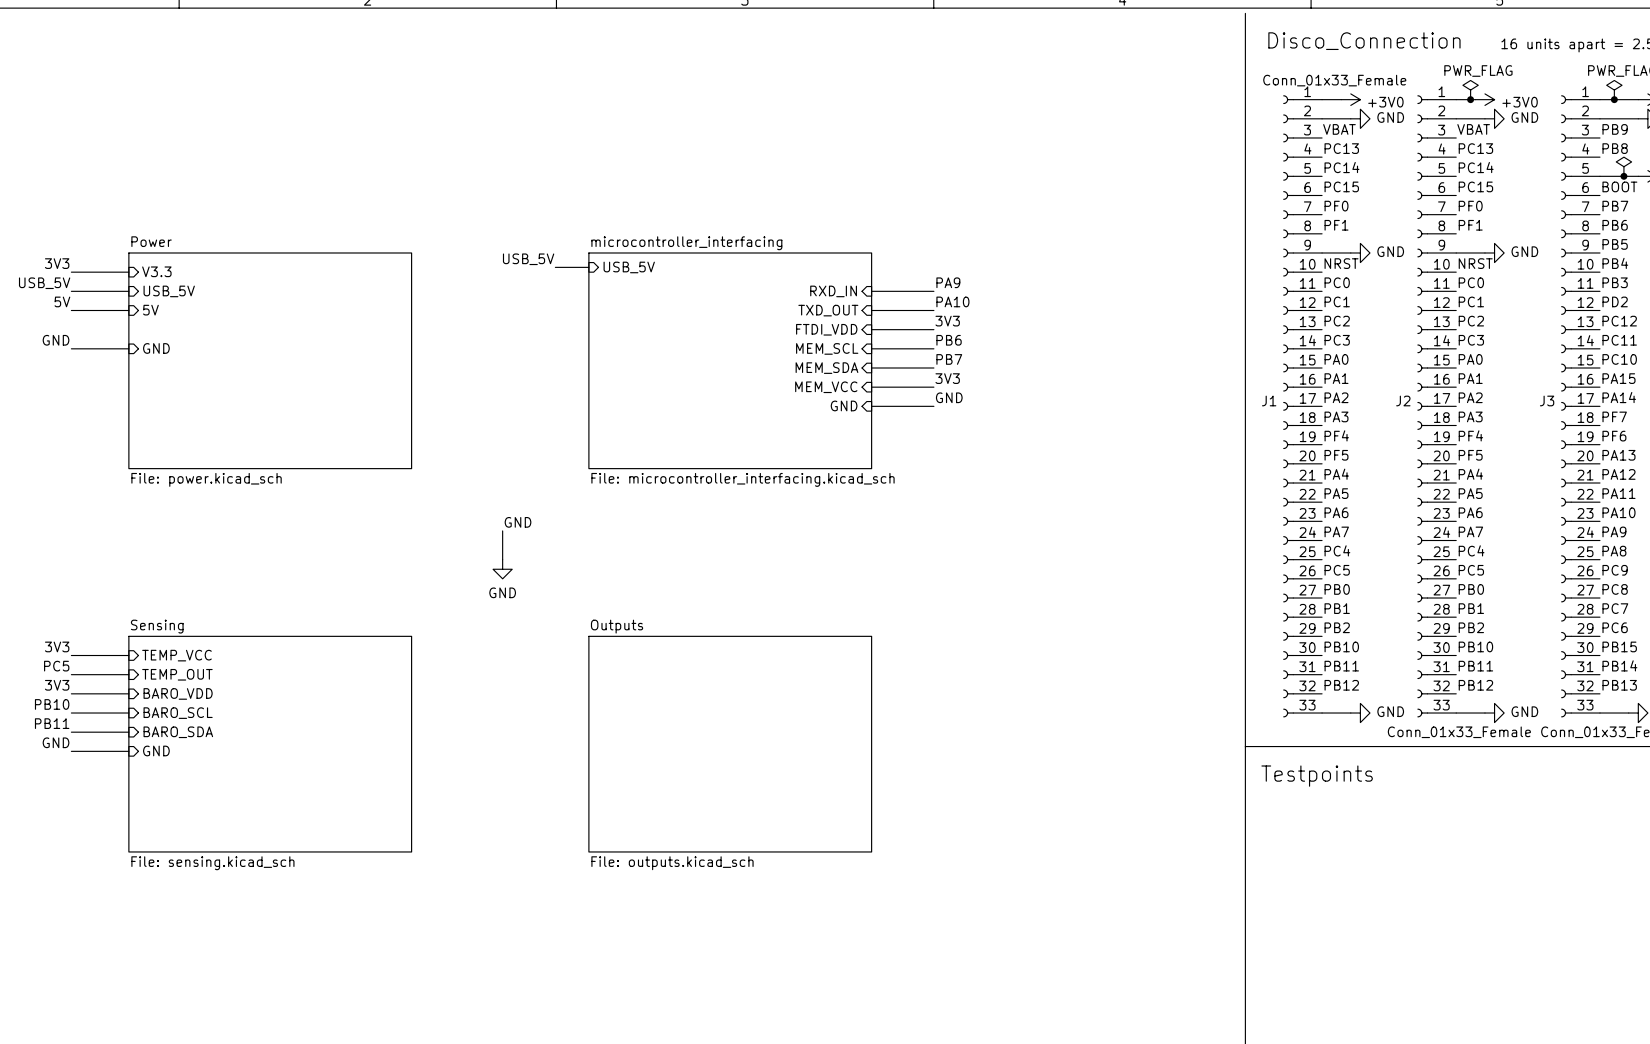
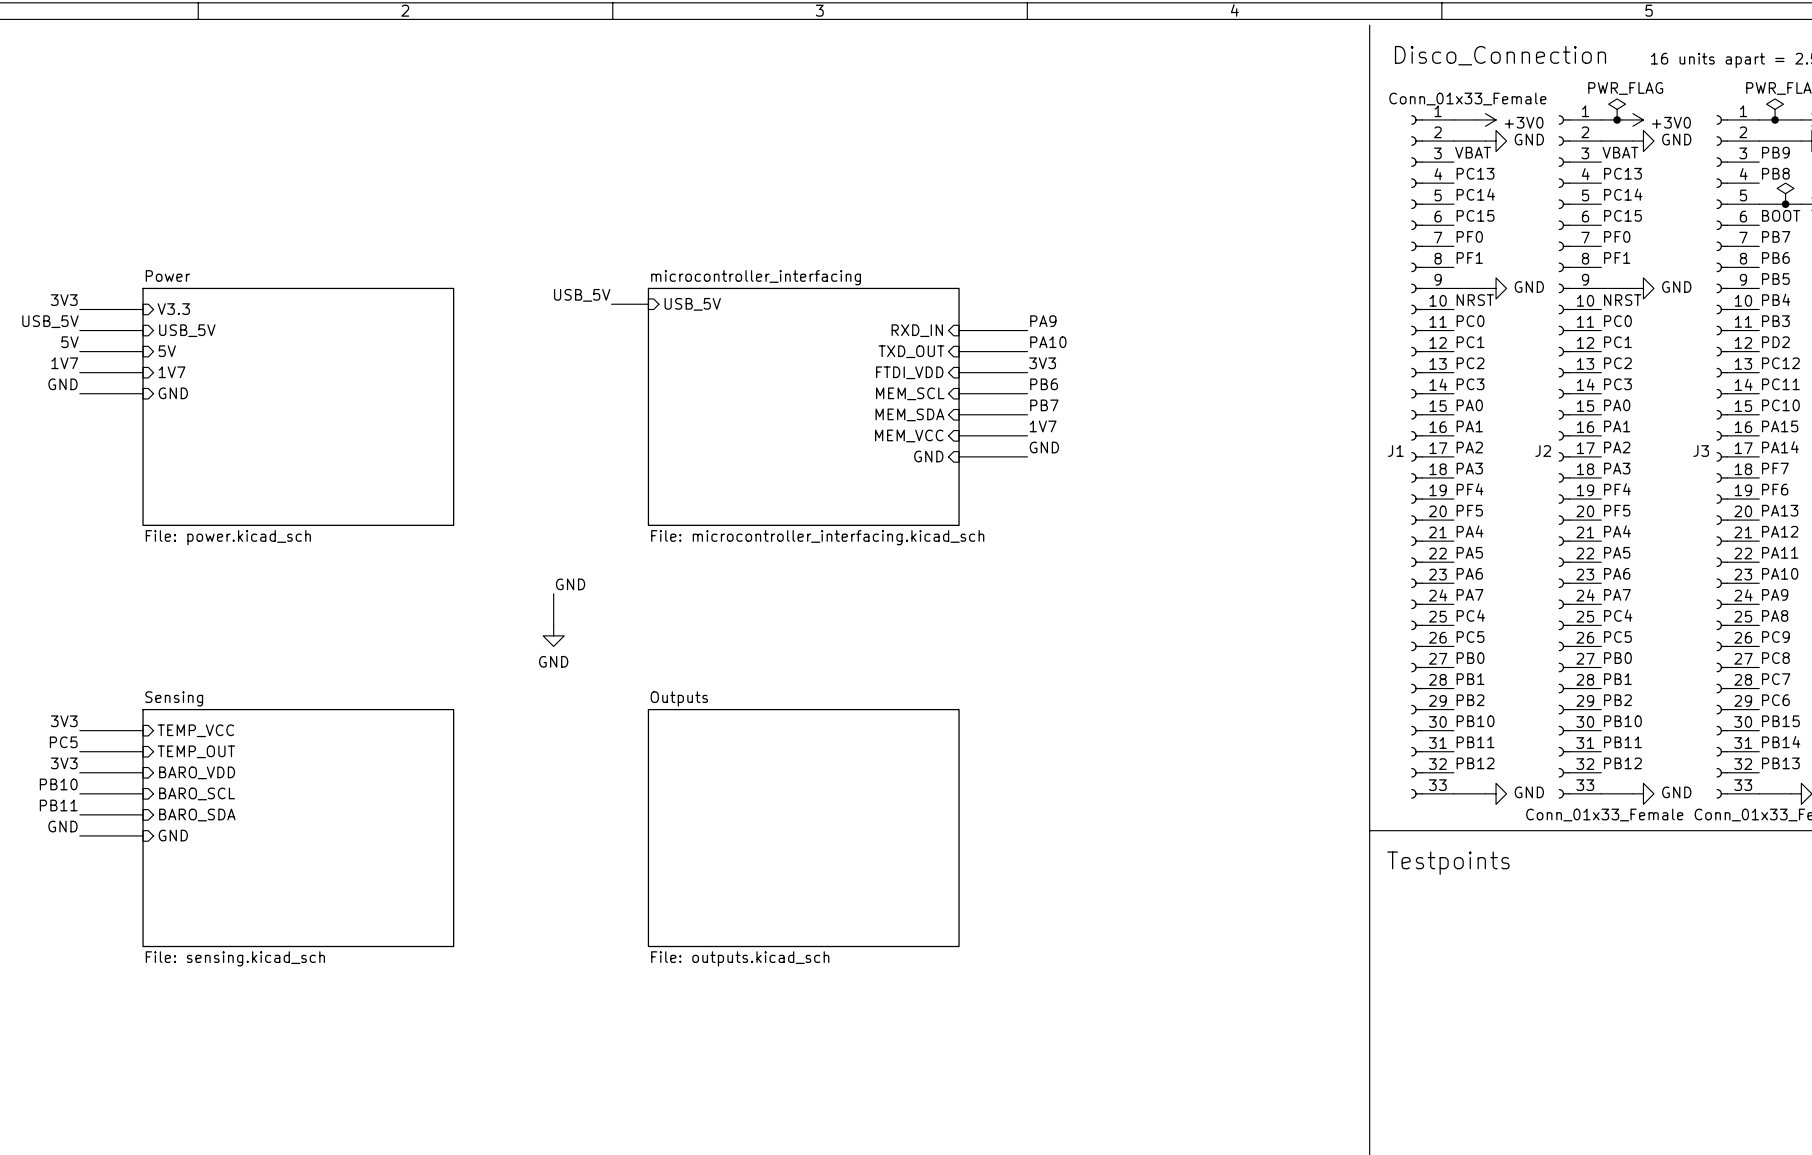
label: none -> 1V7 (64, 363)
wire: none -> (79, 372) (143, 372)
sheet pin: none -> 1V7 (172, 372)
label: 3V3 (947, 378) -> 1V7 (1043, 426)

